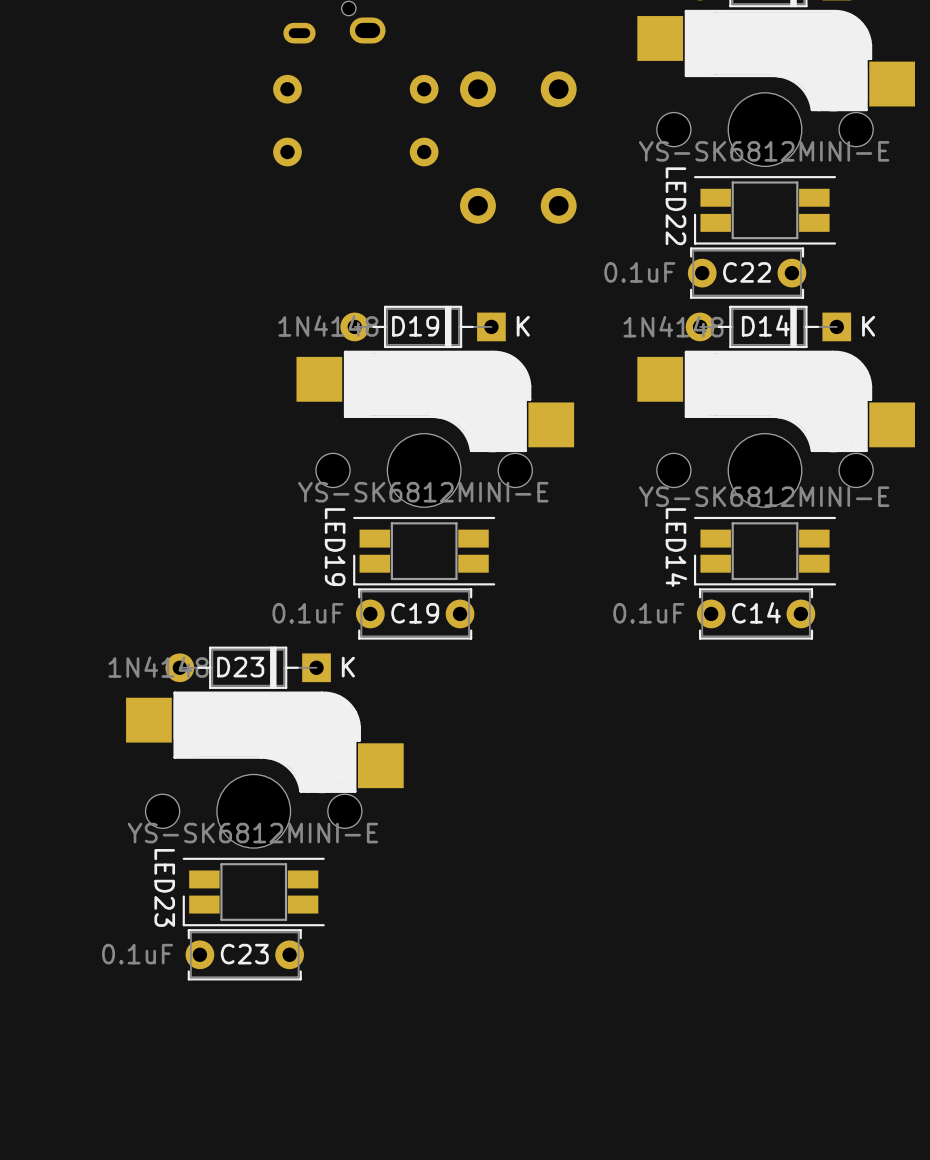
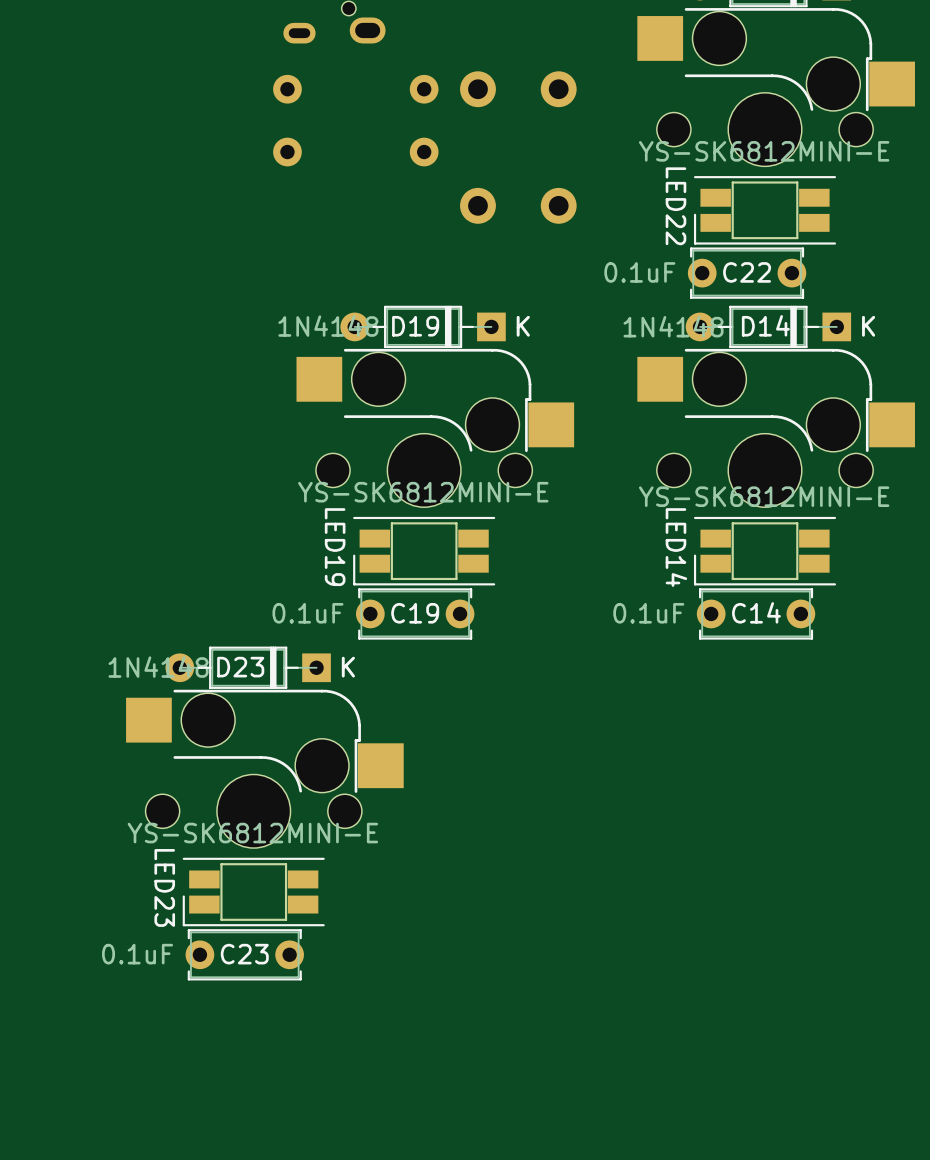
part footprint: [637, 9, 915, 167] -> [637, 8, 915, 167]
part footprint: [296, 350, 575, 508] -> [296, 348, 575, 508]
part footprint: [637, 350, 915, 508] -> [637, 348, 915, 508]
part footprint: [126, 691, 404, 849] -> [126, 689, 404, 849]

